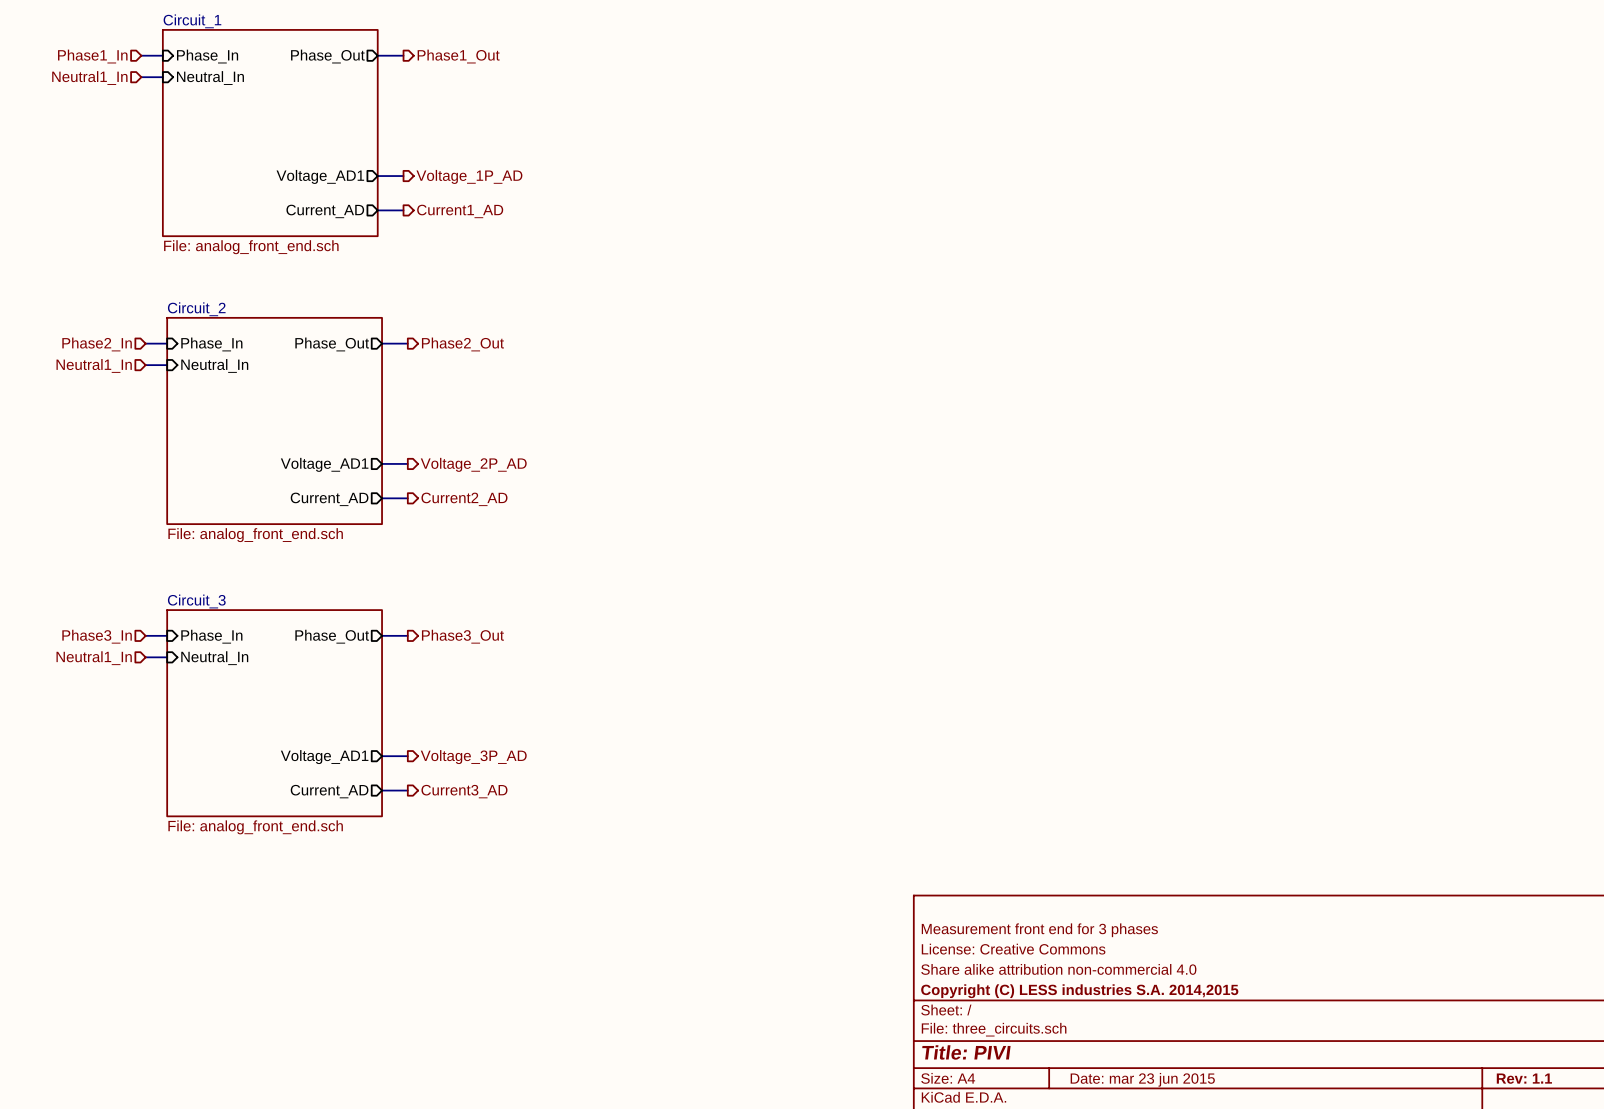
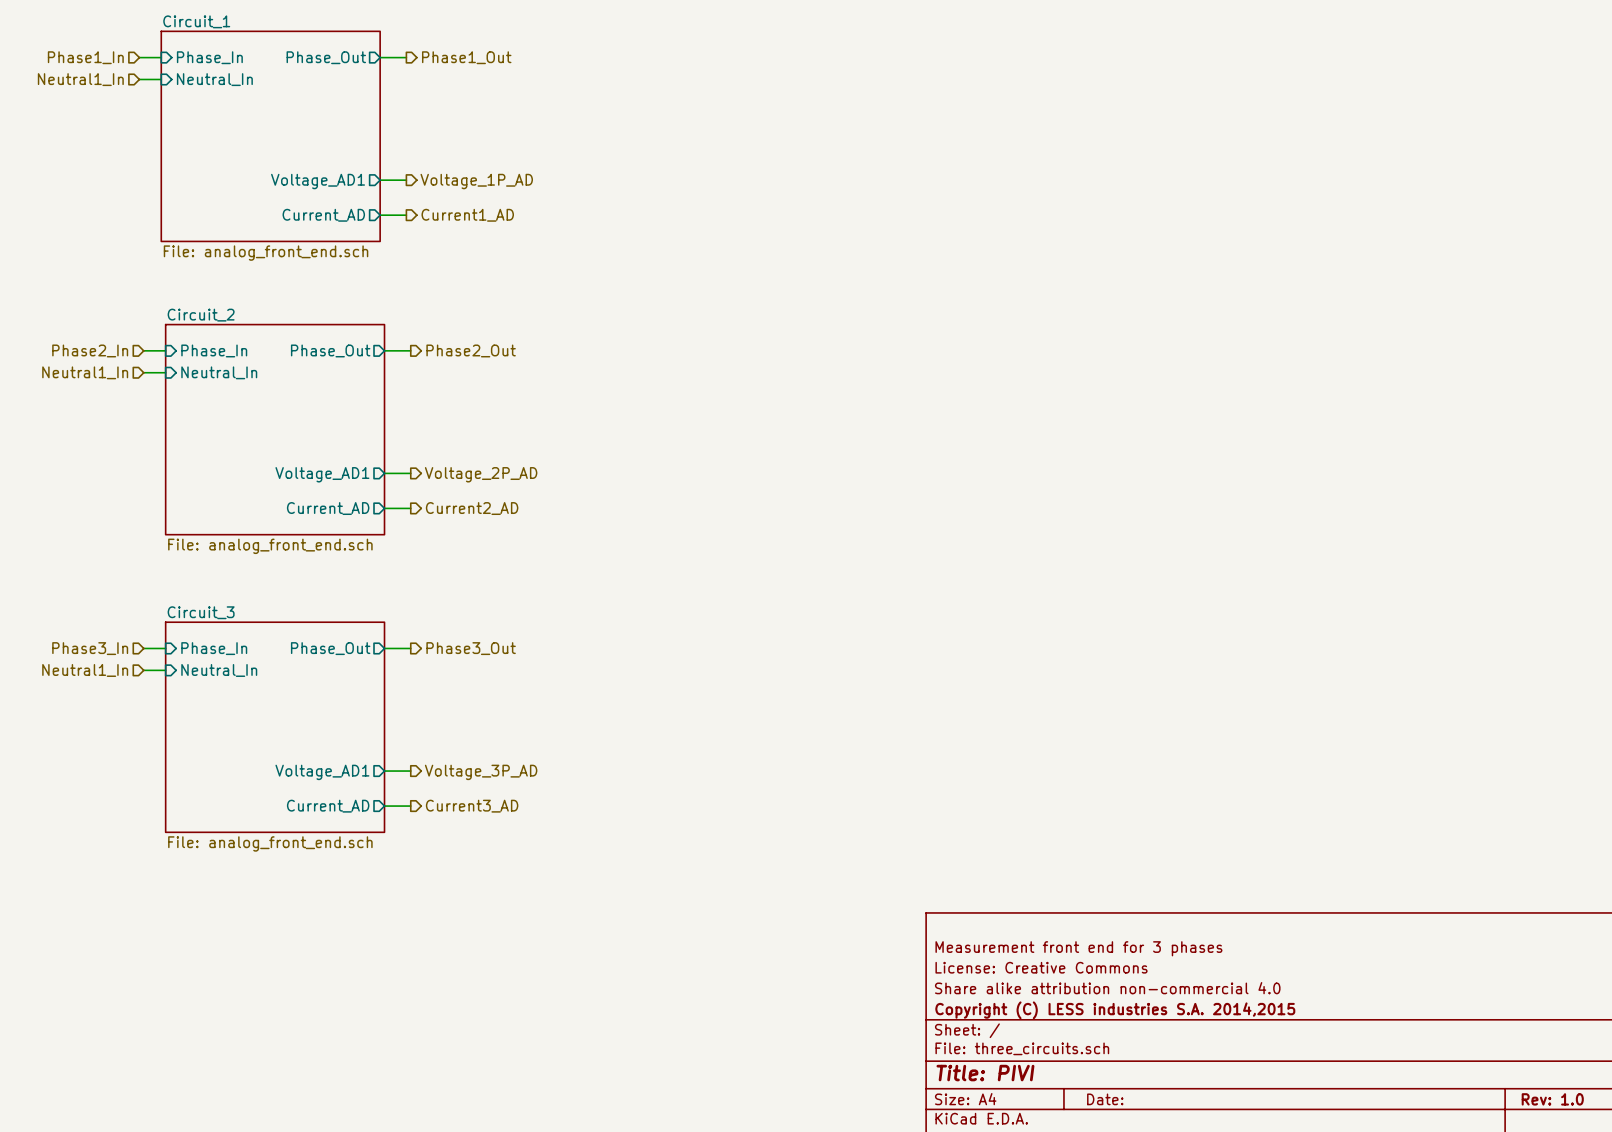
title block: Rev: 1.1 (1524, 1078) -> Rev: 1.0 (1552, 1099)
title block: Date: mar 23 jun 2015 (1142, 1079) -> Date: (1105, 1099)

